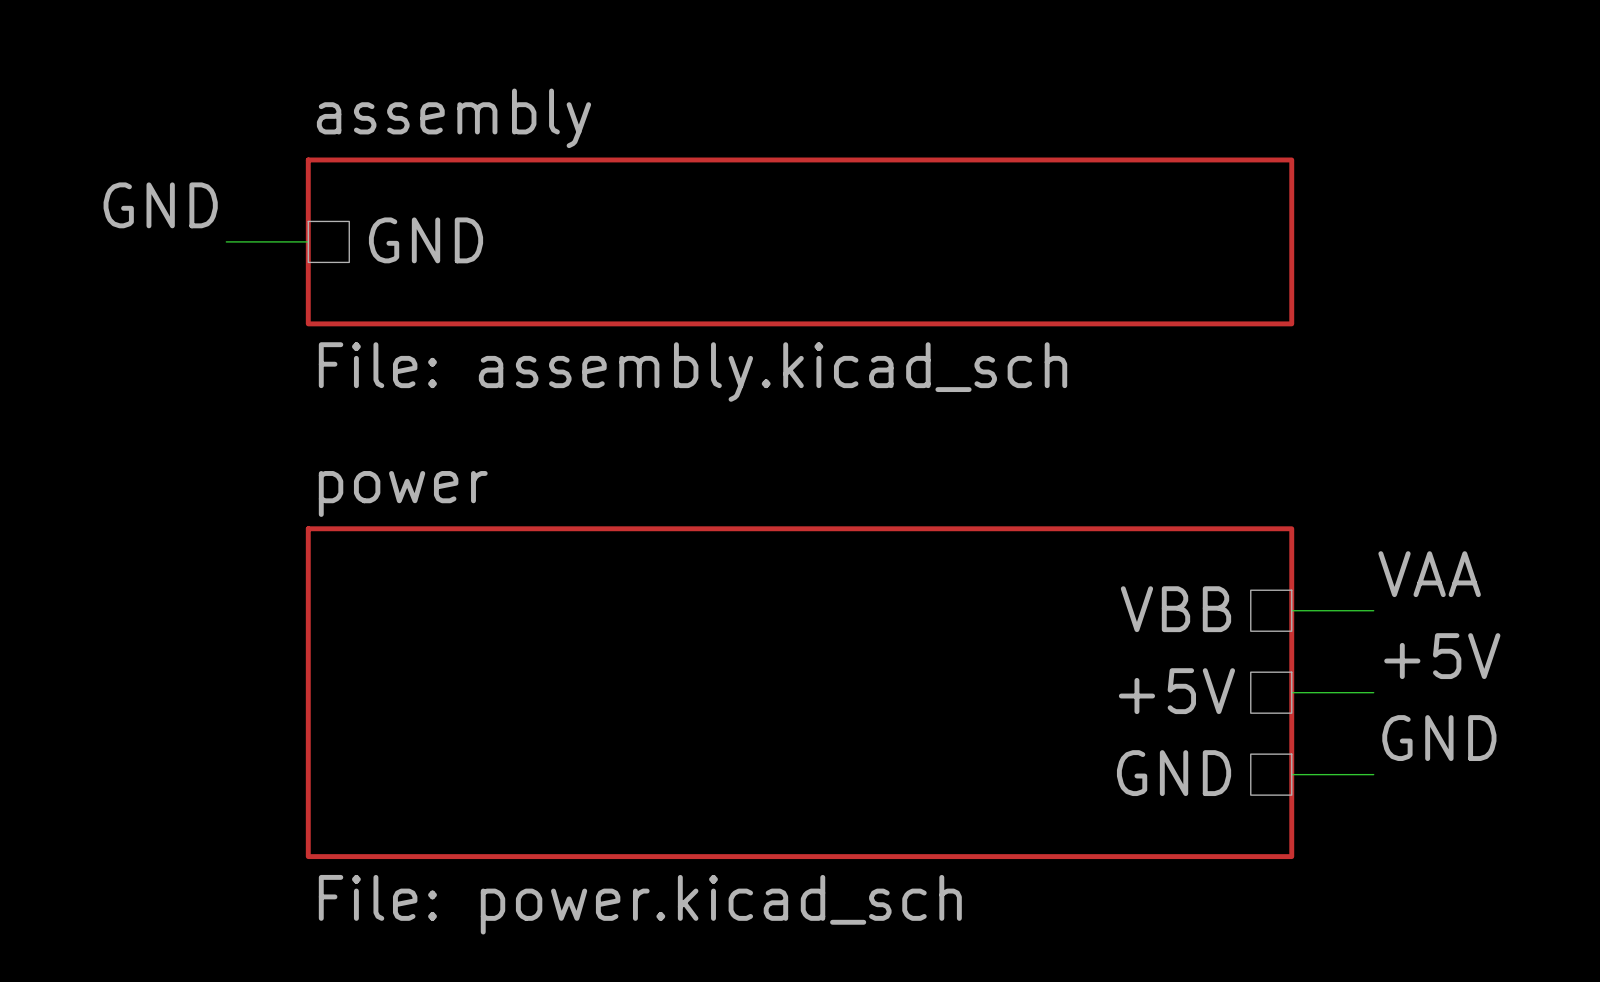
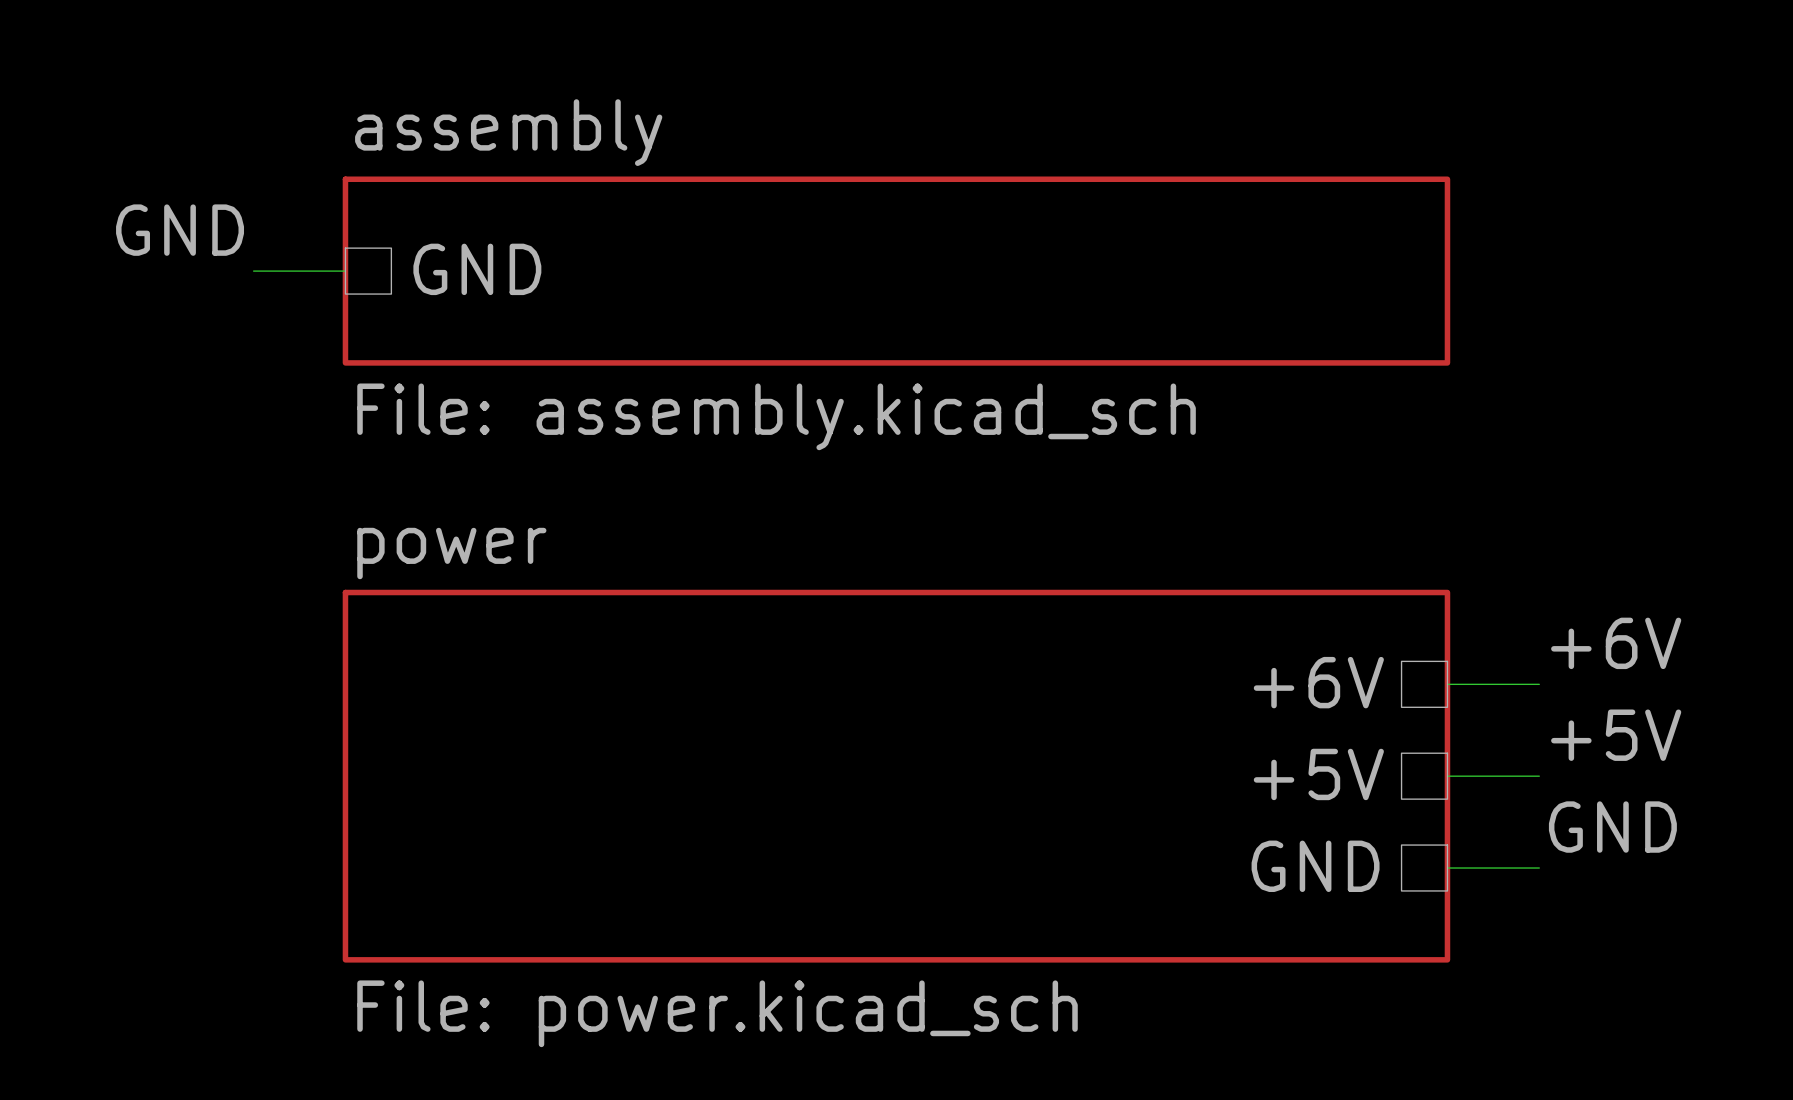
label: VAA (1429, 574) -> +6V (1616, 643)
sheet pin: VBB (1175, 609) -> +6V (1318, 682)

